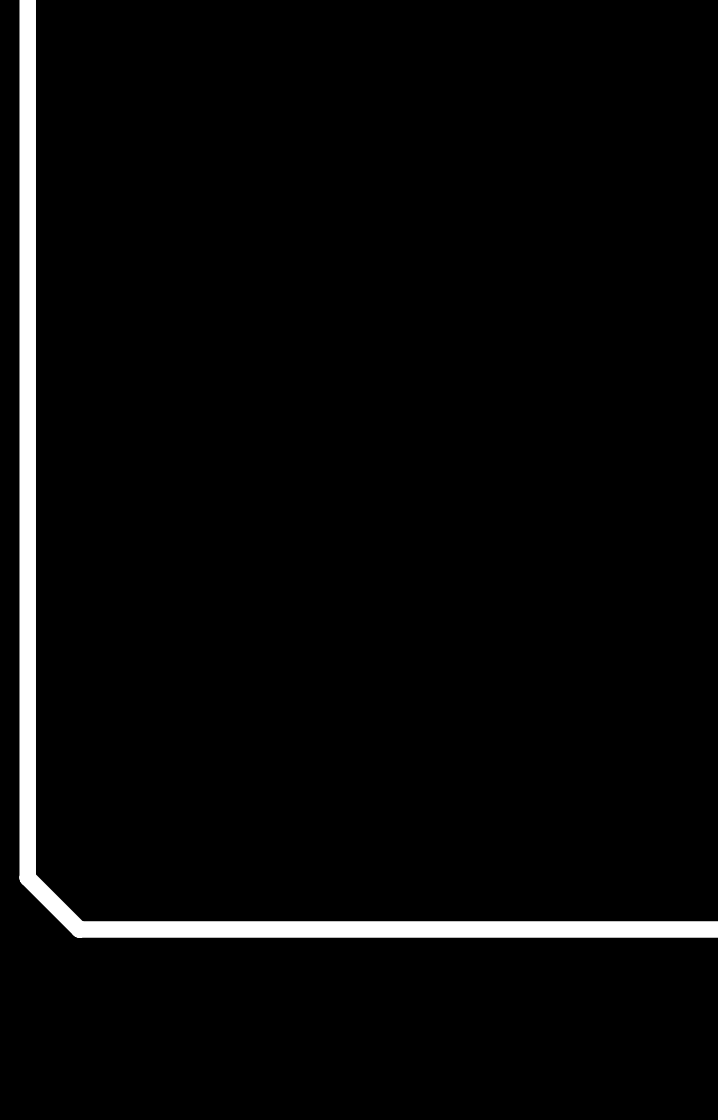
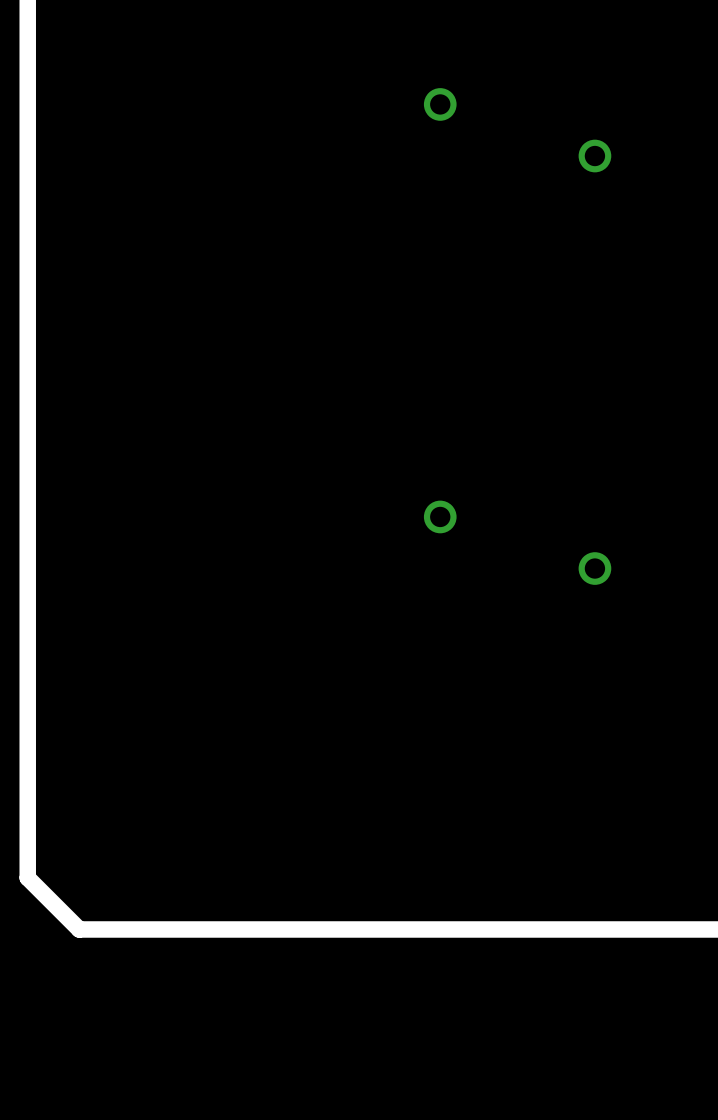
via: none -> (440, 104)
via: none -> (594, 156)
via: none -> (440, 516)
via: none -> (594, 568)

